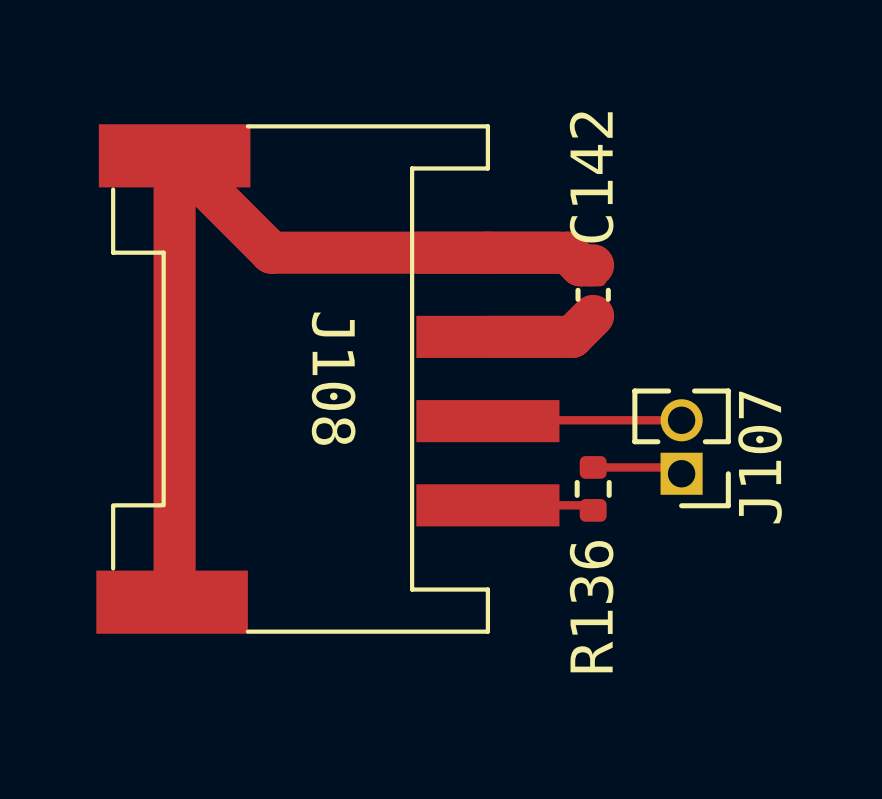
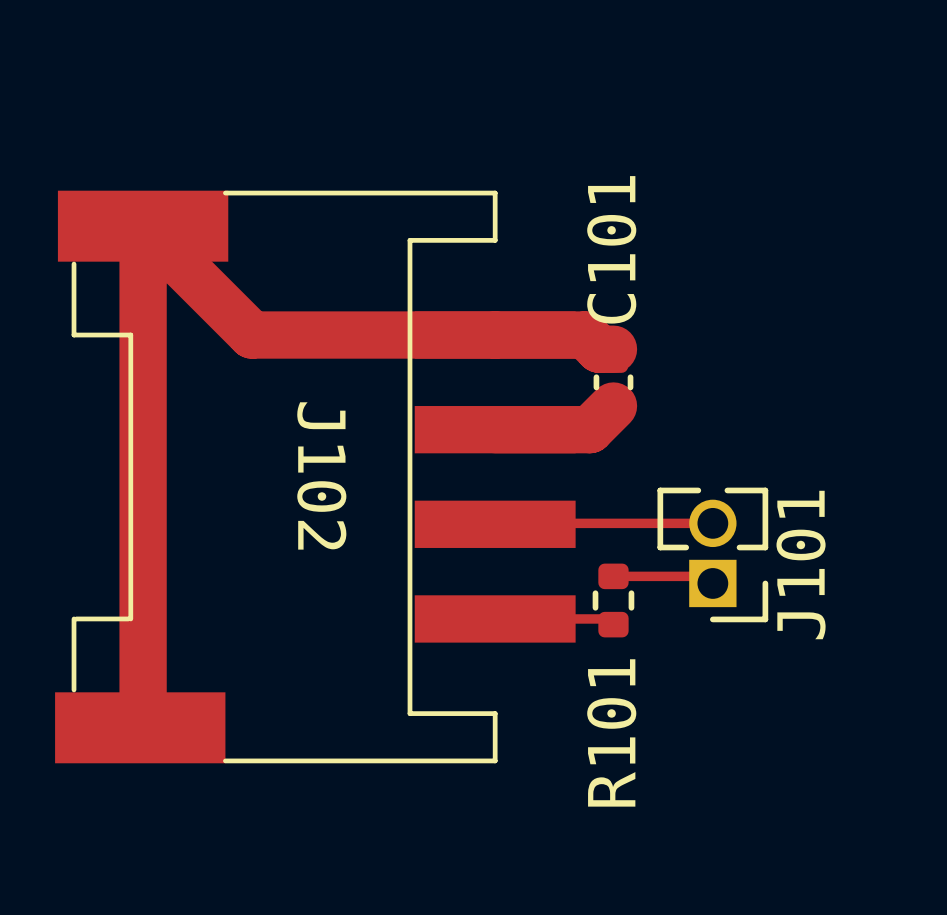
C142 name: C142 (591, 177) -> C101 (611, 249)
J108 name: J108 (333, 378) -> J102 (321, 475)
J107 name: J107 (760, 457) -> J101 (801, 565)
R136 name: R136 (591, 606) -> R101 (611, 732)

